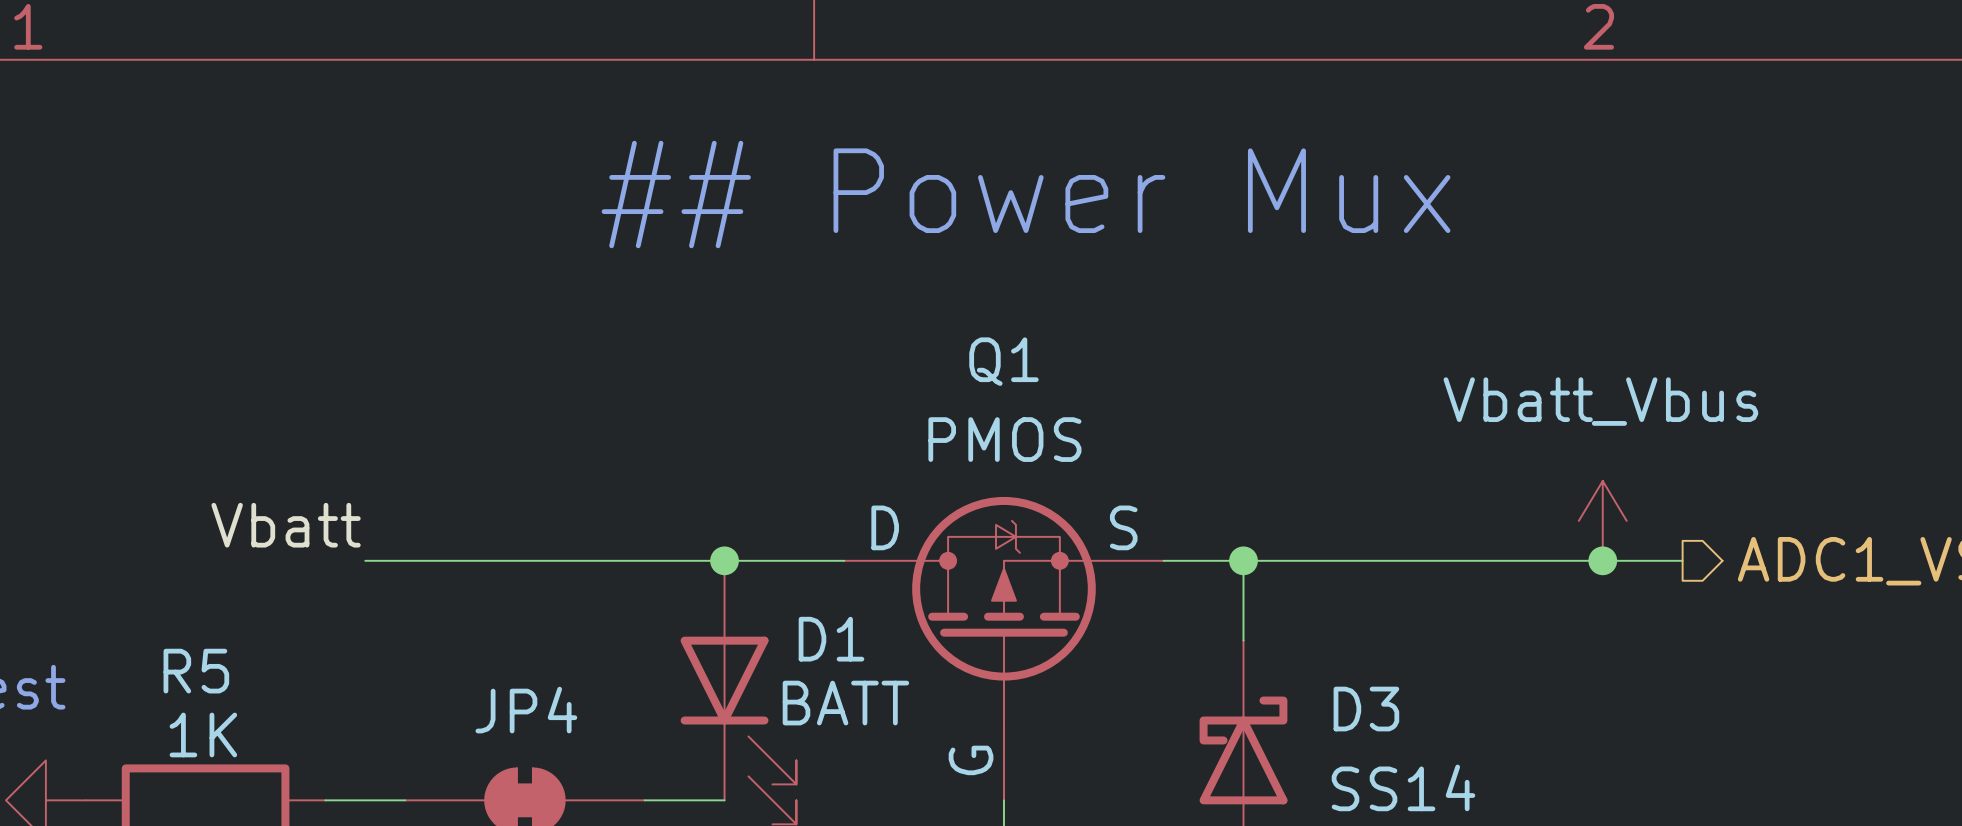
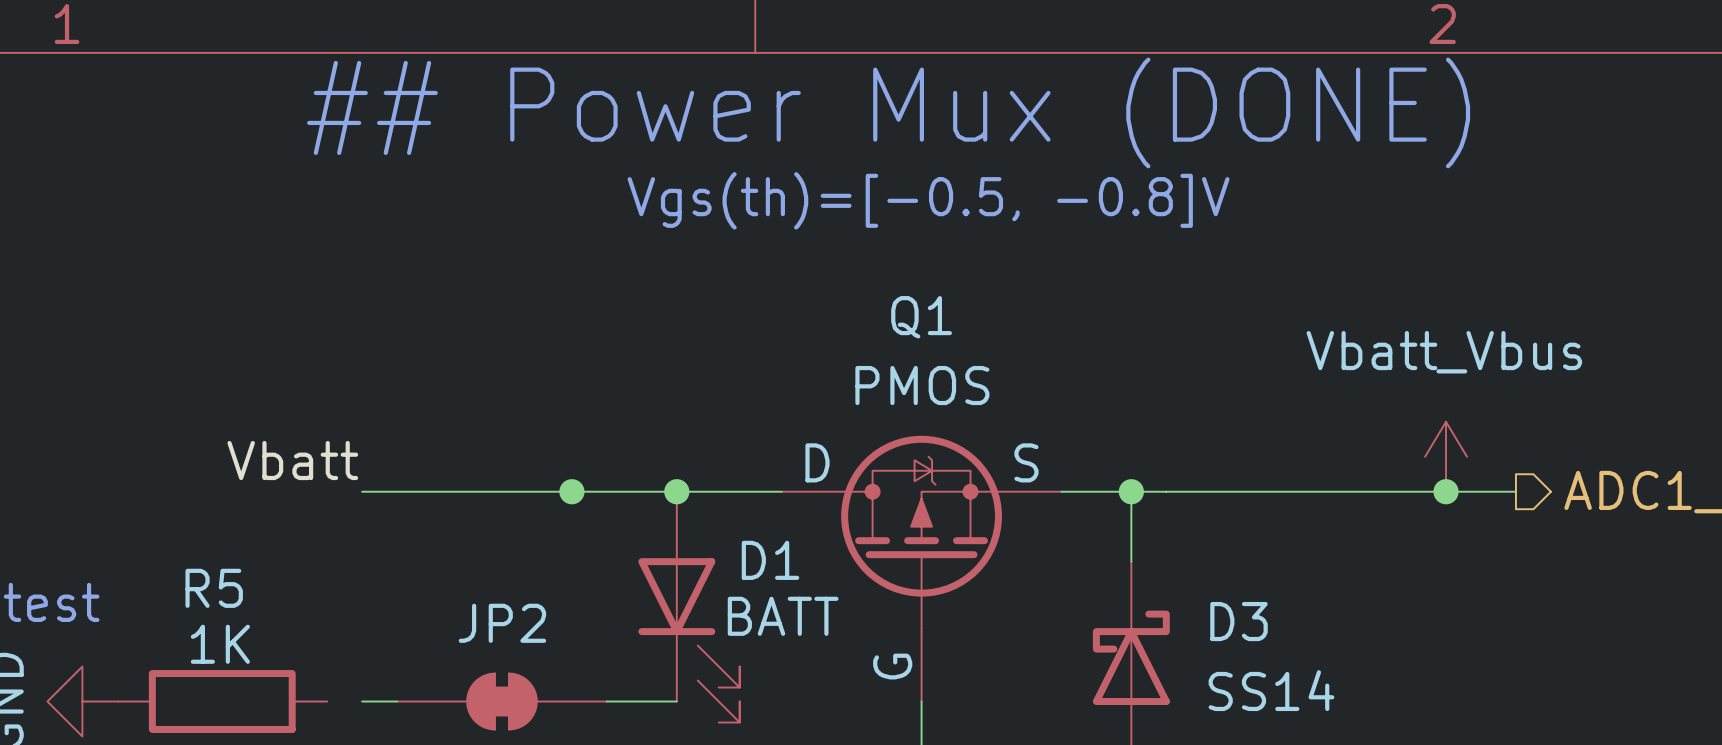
text: ## Power Mux (1026, 194) -> ## Power Mux (DONE) (888, 112)
text: none -> Vgs(th)=[-0.5, -0.8]V (928, 200)
junction: none -> (571, 491)
JP4 name: JP4 (526, 710) -> JP2 (502, 623)
wire: (325, 800) (365, 800) -> none

